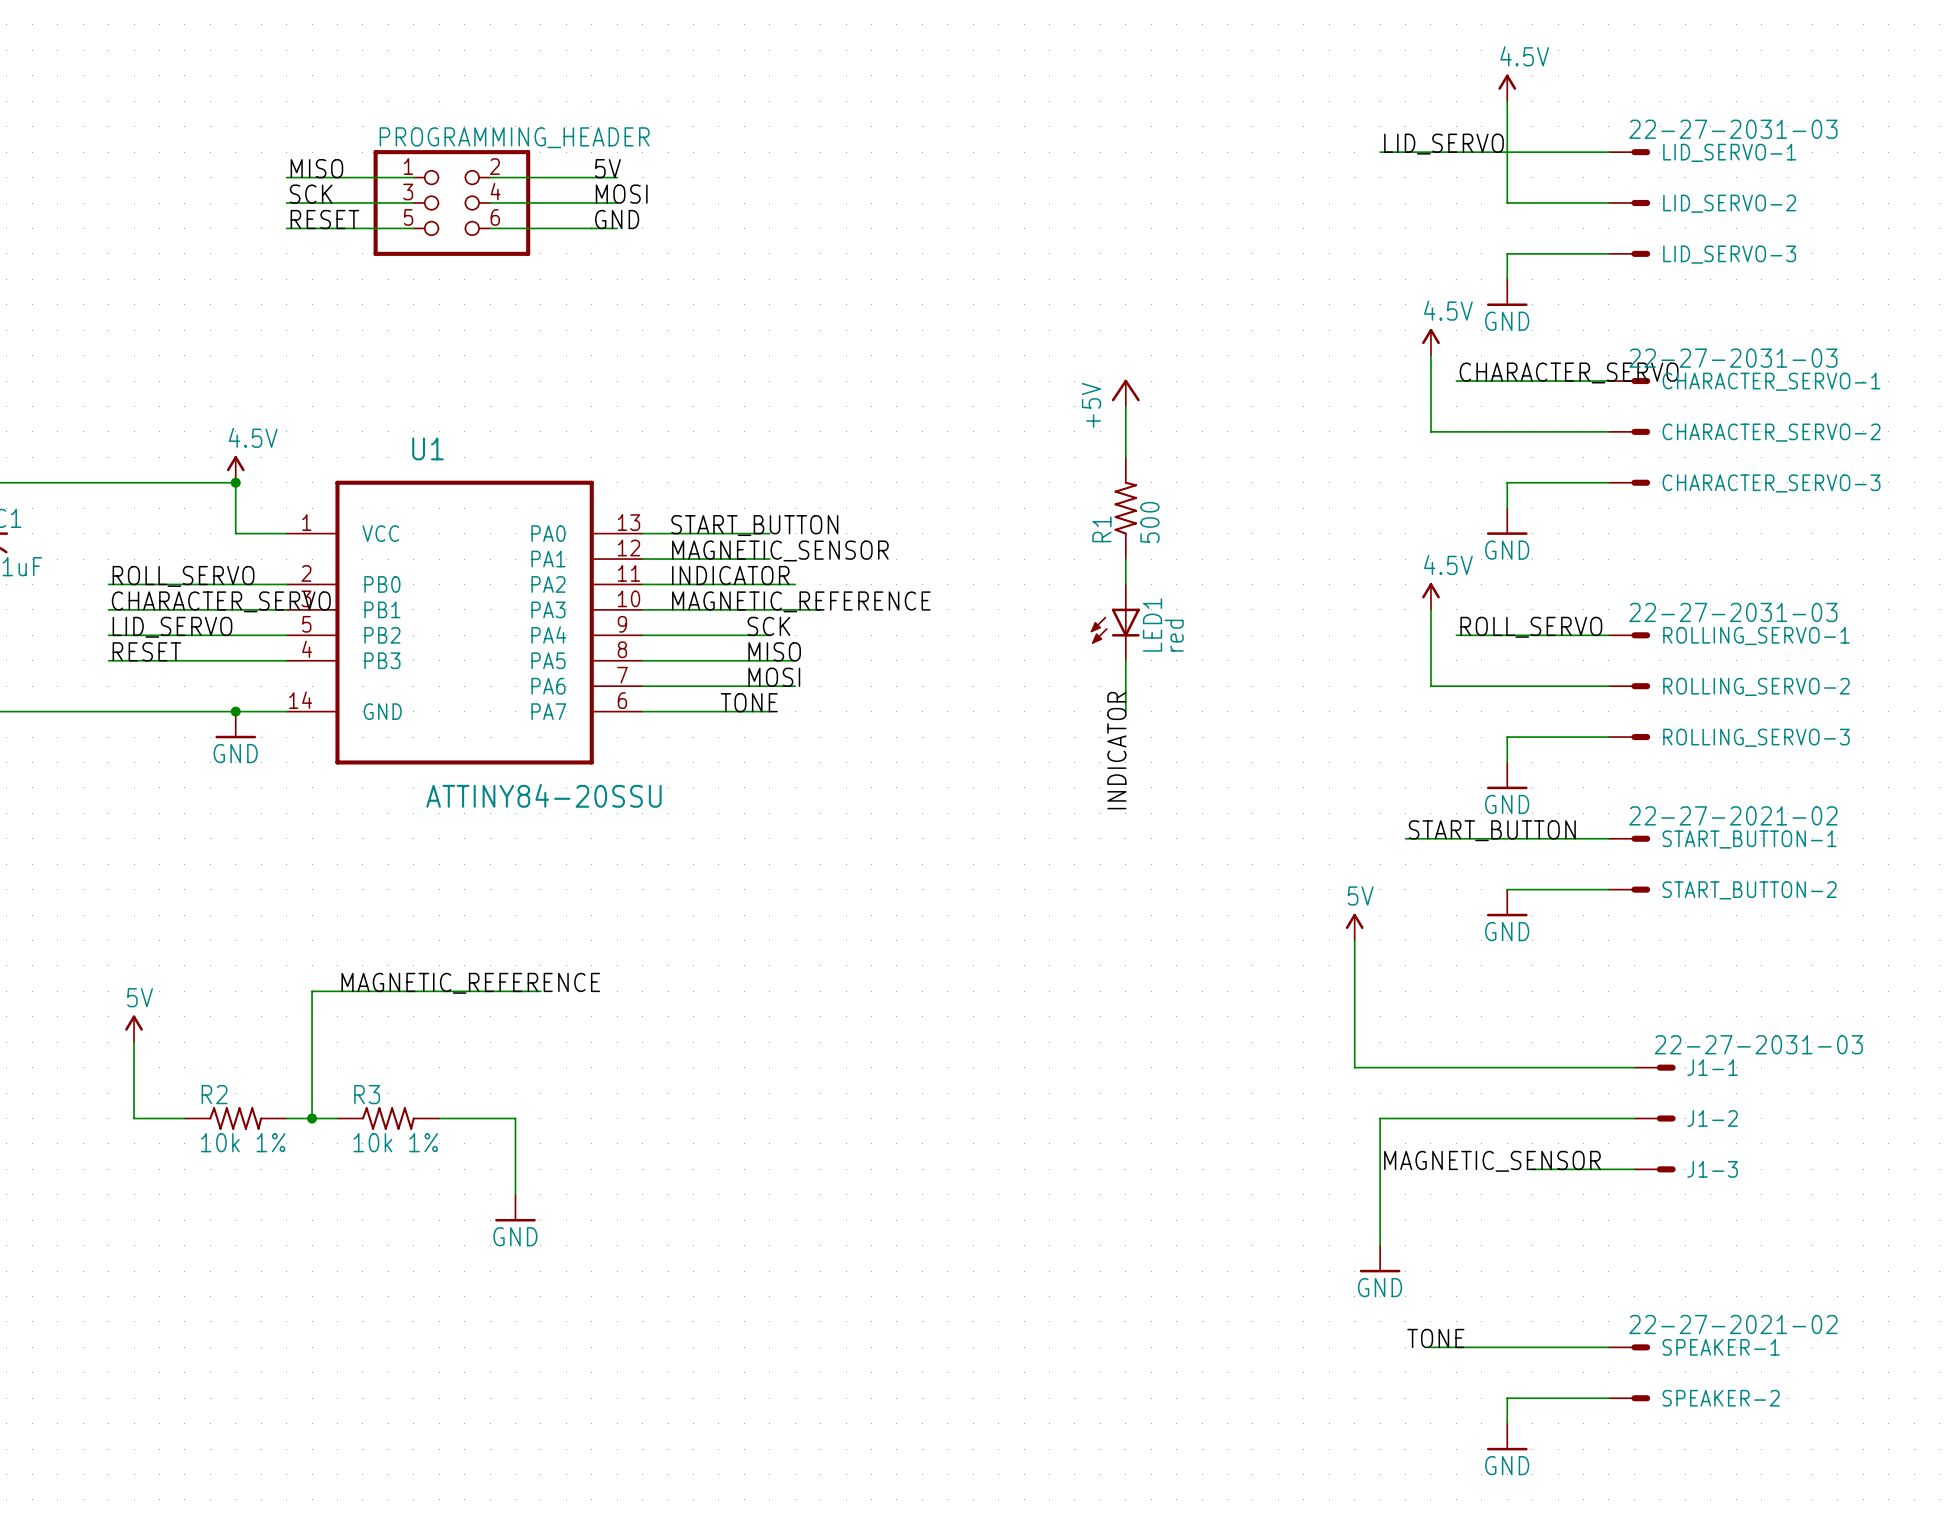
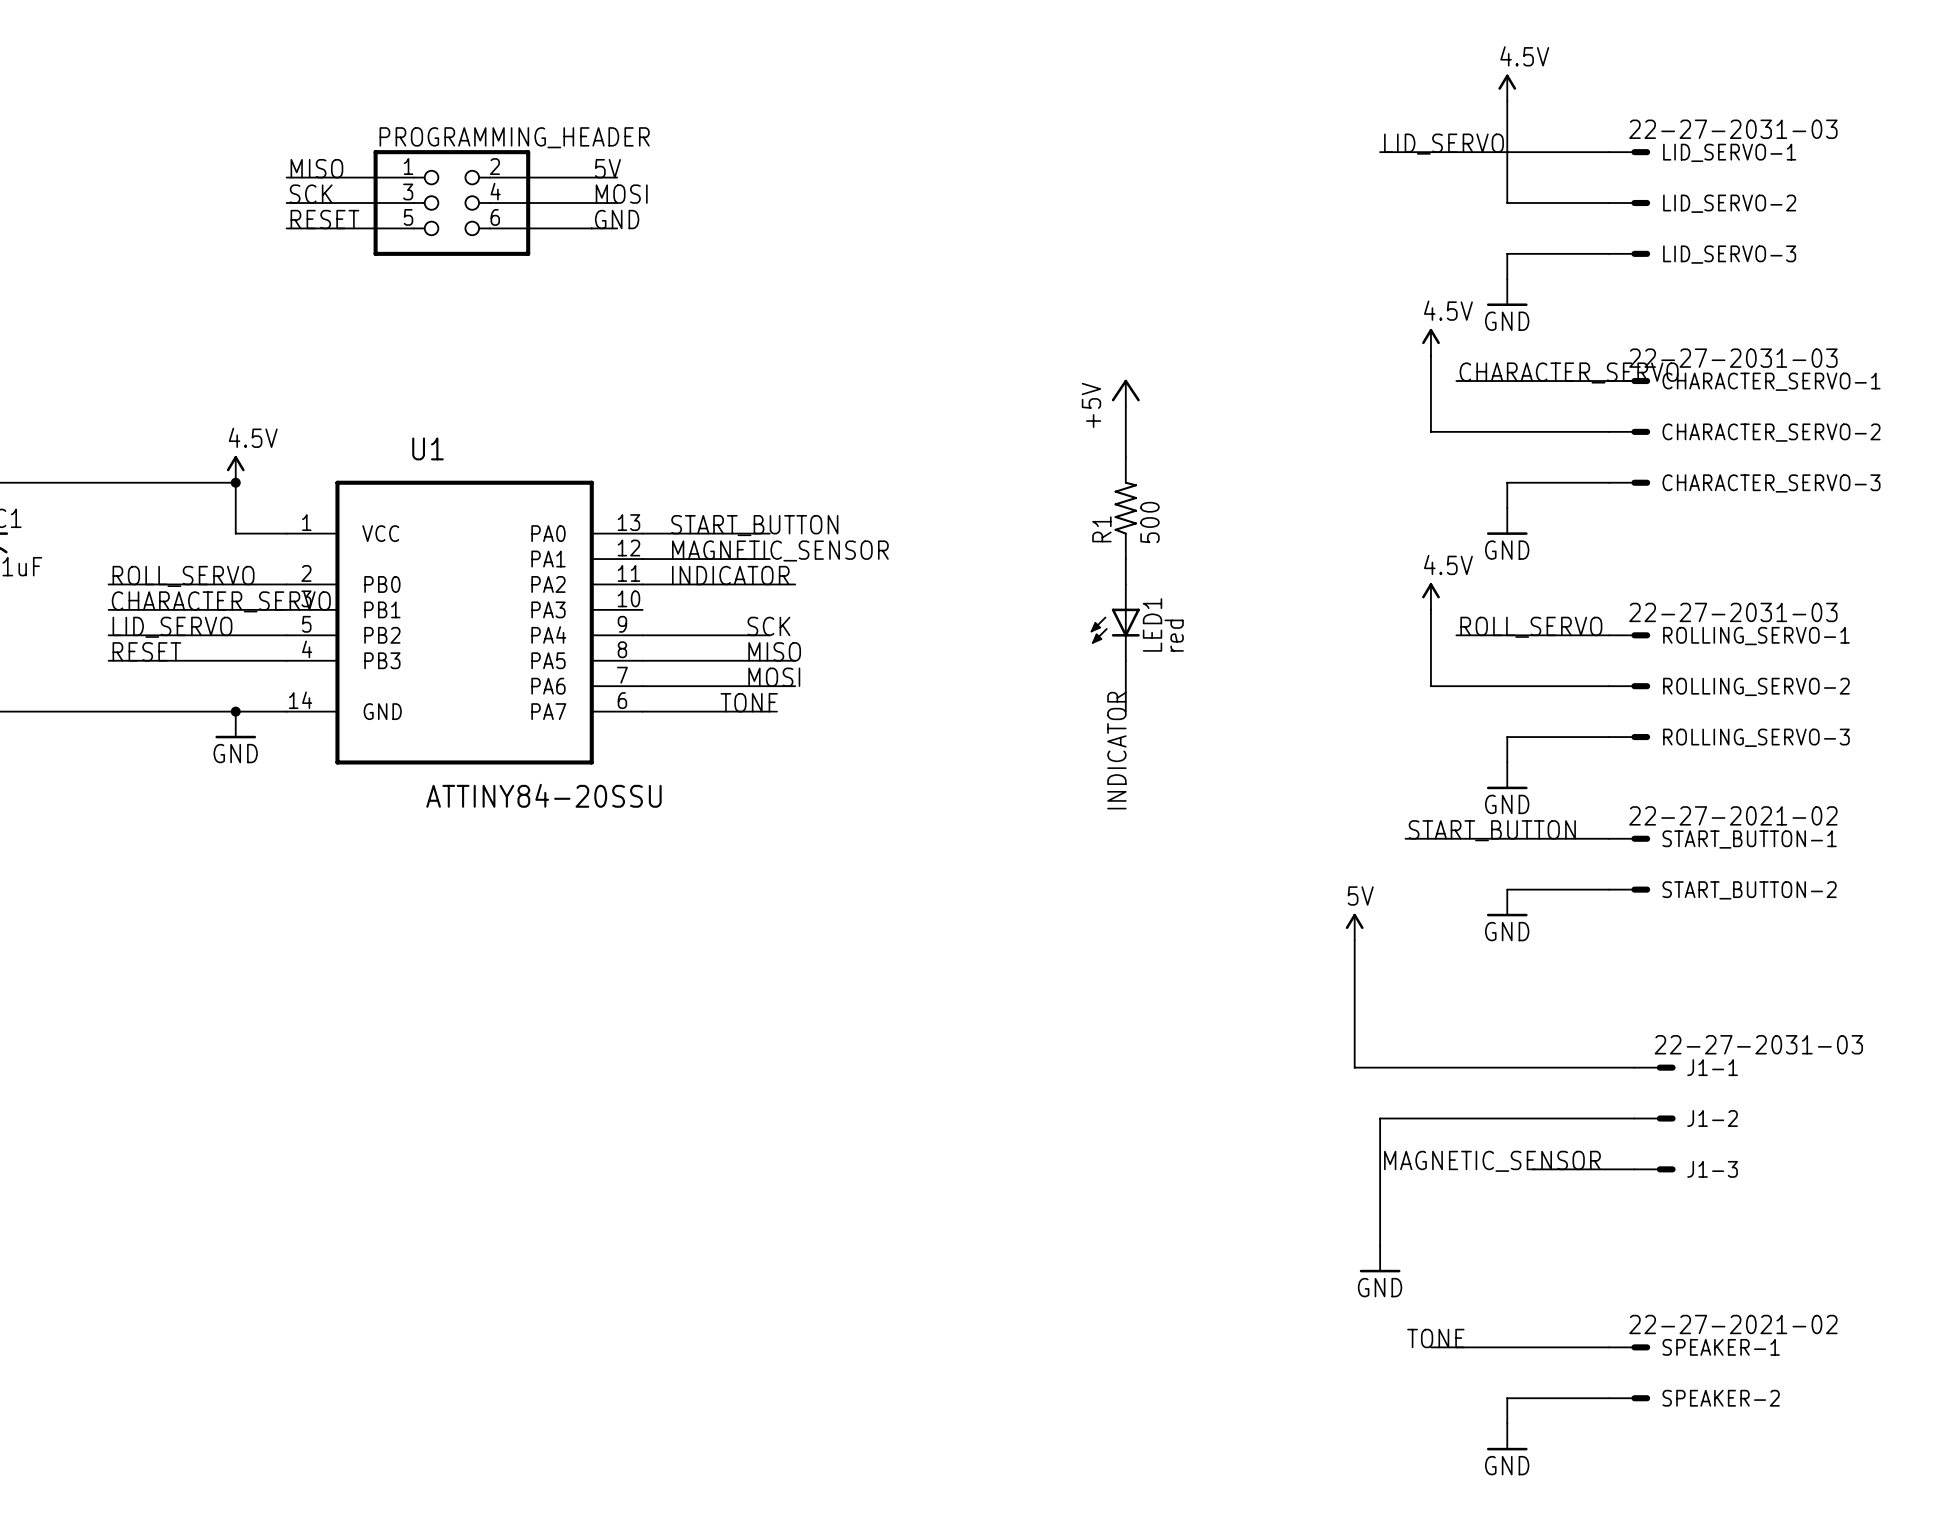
label: MAGNETIC_REFERENCE (801, 601) -> none
wire: (642, 609) (820, 609) -> none
label: MAGNETIC_REFERENCE (470, 983) -> none
wire: (540, 991) (312, 991) (312, 1118) -> none
power symbol: 5V (134, 1028) -> none
wire: (134, 1042) (134, 1118) (184, 1118) -> none
R2: 10k 1% (235, 1118) -> none
wire: (286, 1118) (337, 1118) -> none
junction: (312, 1118) -> none
R3: 10k 1% (388, 1118) -> none
wire: (439, 1118) (515, 1118) (515, 1194) -> none
power symbol: GND (515, 1208) -> none

